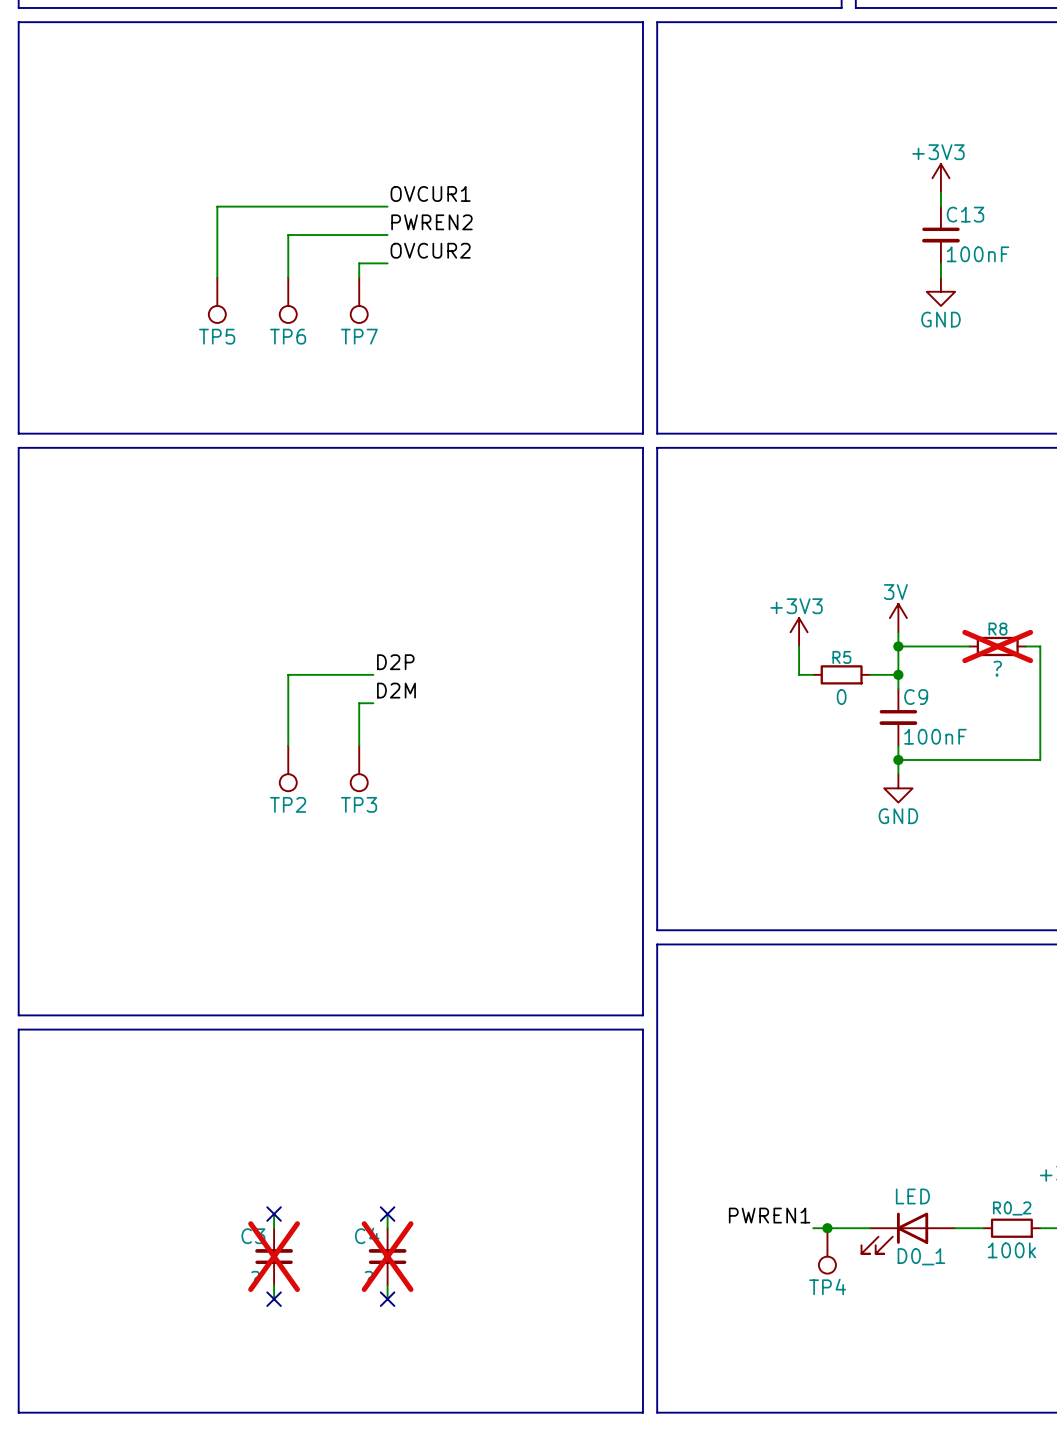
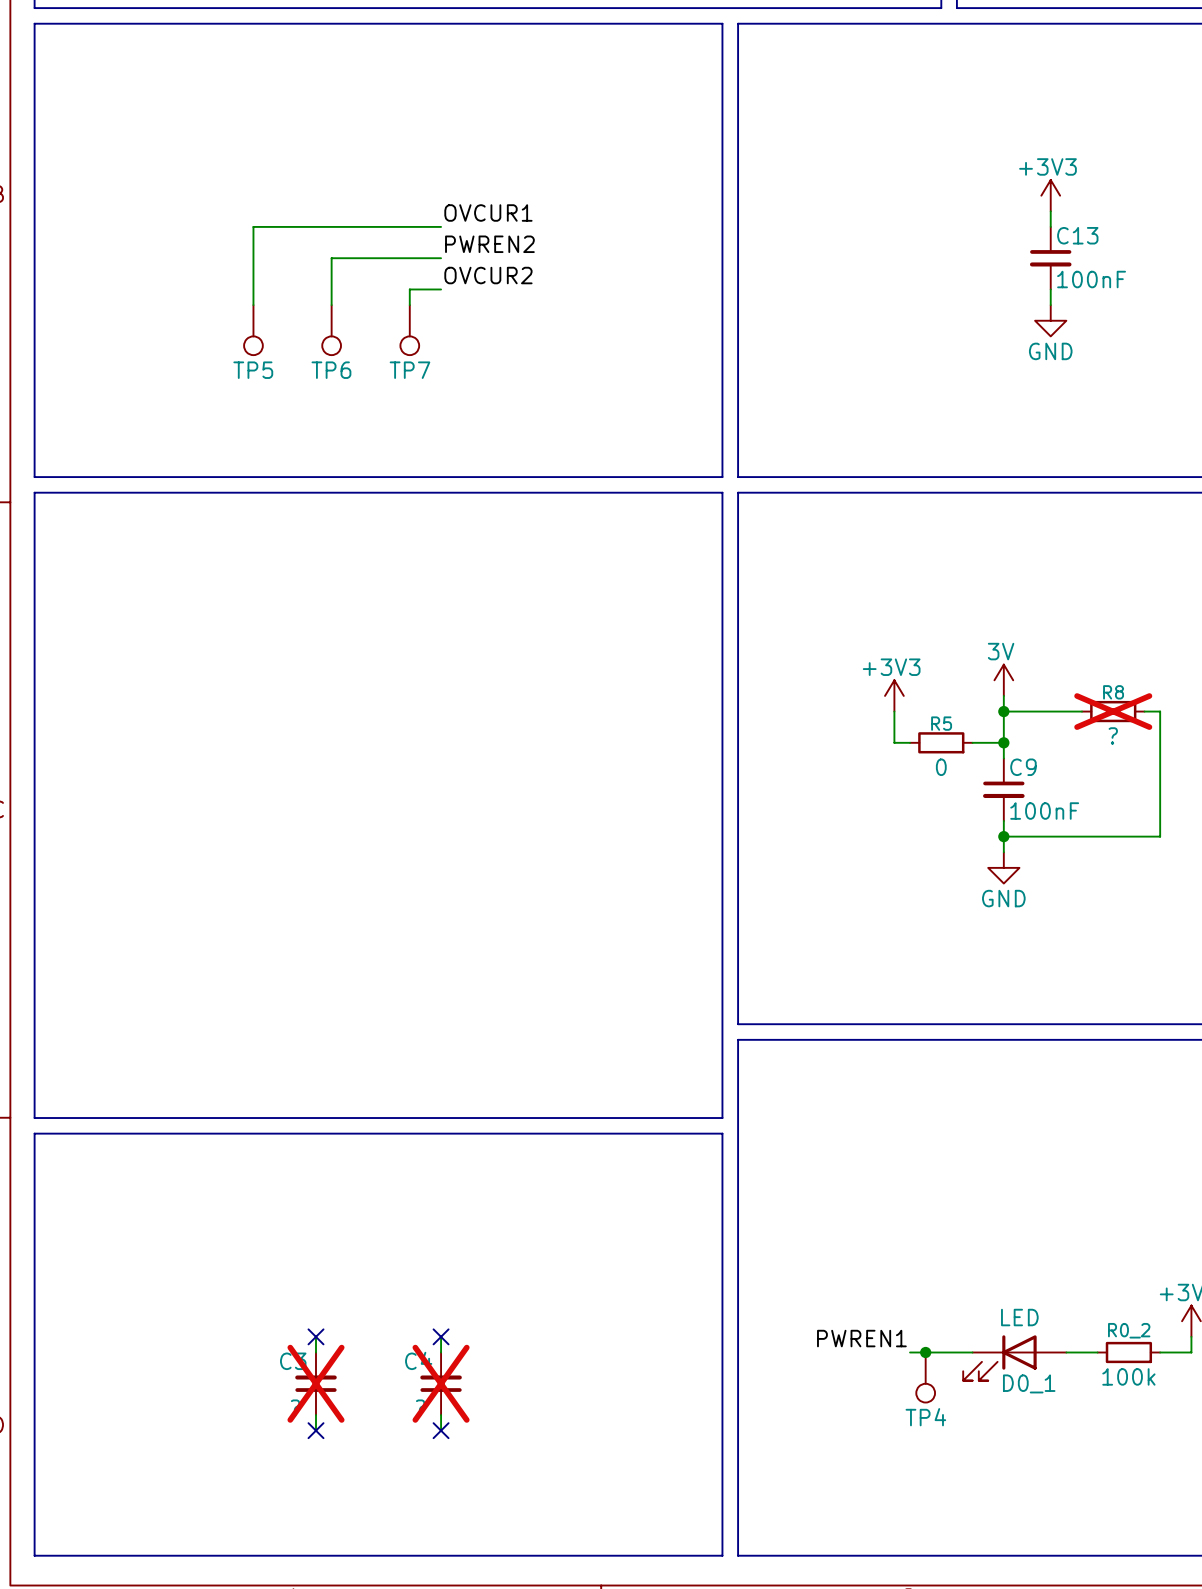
label: D2P (395, 662) -> none
wire: (373, 674) (288, 674) (288, 745) -> none
label: D2M (396, 690) -> none
wire: (373, 703) (359, 703) (359, 745) -> none
TP2: (288, 768) -> none
TP3: (359, 768) -> none

